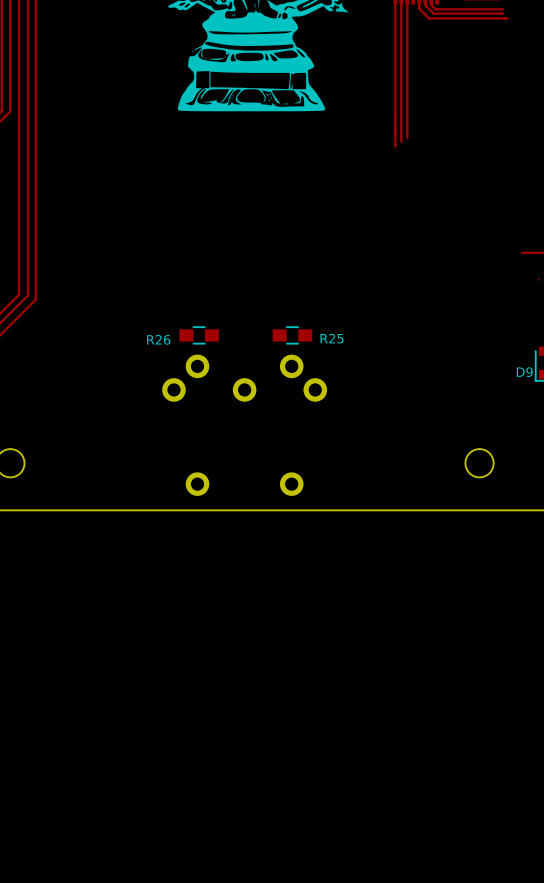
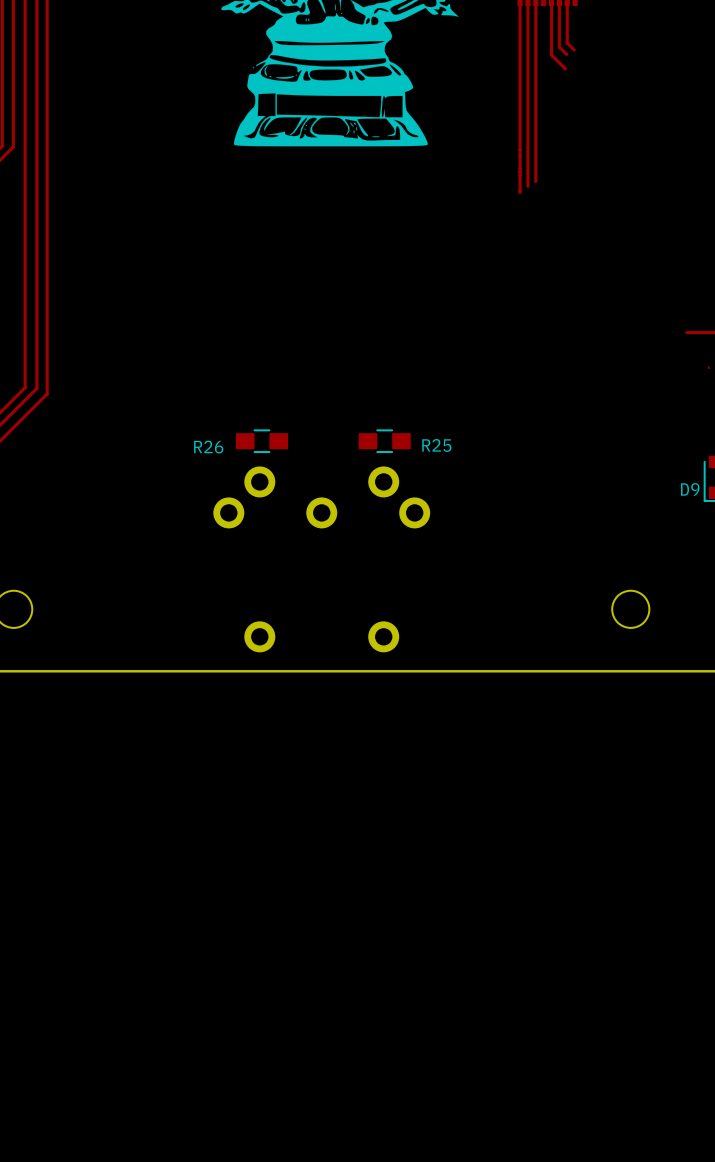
track: (425, 5) (433, 13) (503, 13) -> (559, 6) (559, 47) (566, 54)
track: (431, 5) (435, 9) (503, 9) -> (567, 6) (567, 43) (574, 49)
track: (419, 8) (428, 18) (507, 18) -> (551, 11) (551, 55) (565, 68)

